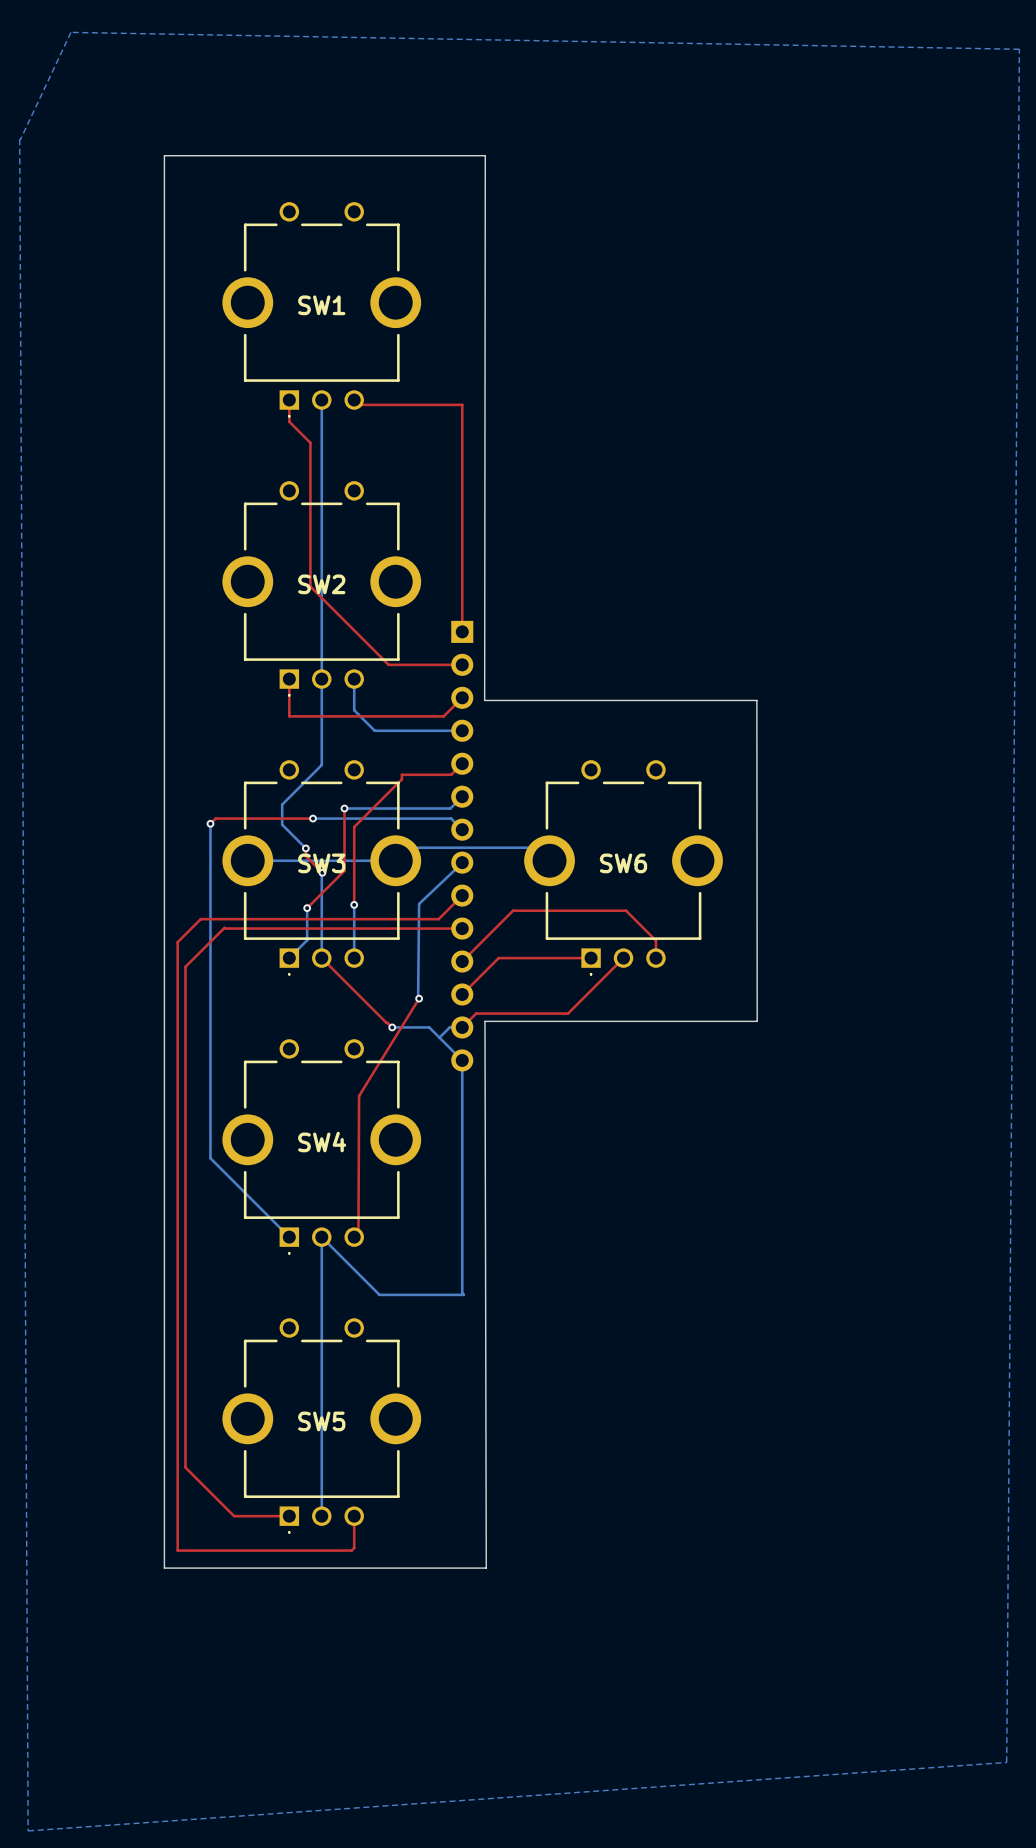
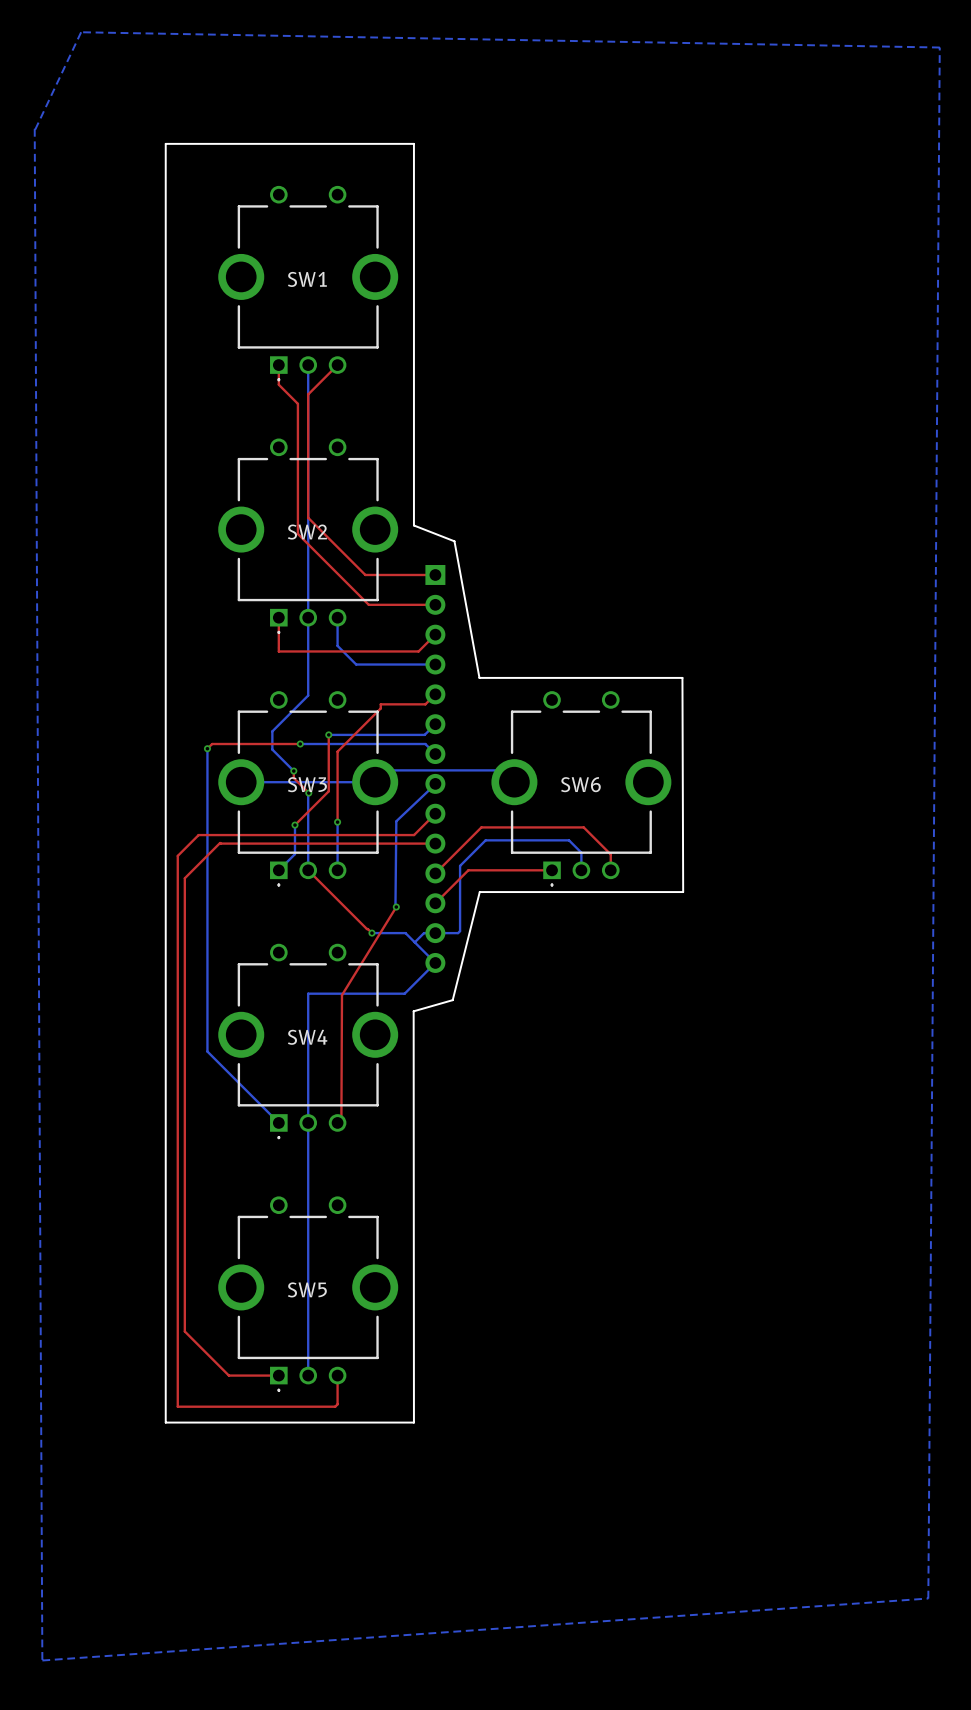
board edge: (438, 155) (485, 155) (484, 700) (756, 700) (757, 1021) (484, 1021) (486, 1568) (438, 1568) -> (413, 143) (413, 525) (454, 541) (479, 677) (682, 677) (683, 892) (479, 892) (452, 1000) (413, 1011) (413, 1422)
top track: (355, 404) (462, 404) (462, 631) -> (337, 365) (308, 394) (308, 517) (365, 574) (435, 574)
top track: (623, 958) (568, 1013) (476, 1013) (462, 1027) -> none
bottom track: none -> (581, 870) (581, 852) (569, 840) (485, 840) (460, 865) (460, 931) (458, 933) (435, 933)
bottom track: (462, 1060) (462, 1293) (463, 1294) (379, 1294) (321, 1237) -> (435, 962) (404, 993) (308, 993) (308, 1122)

